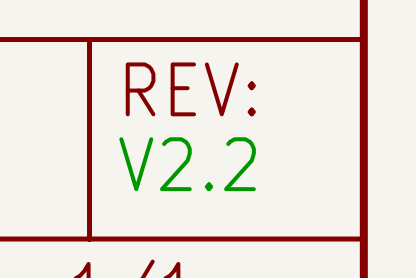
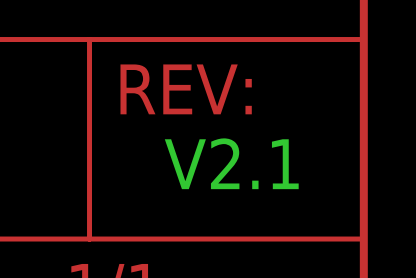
text: V2.2 (187, 164) -> V2.1 (231, 163)

